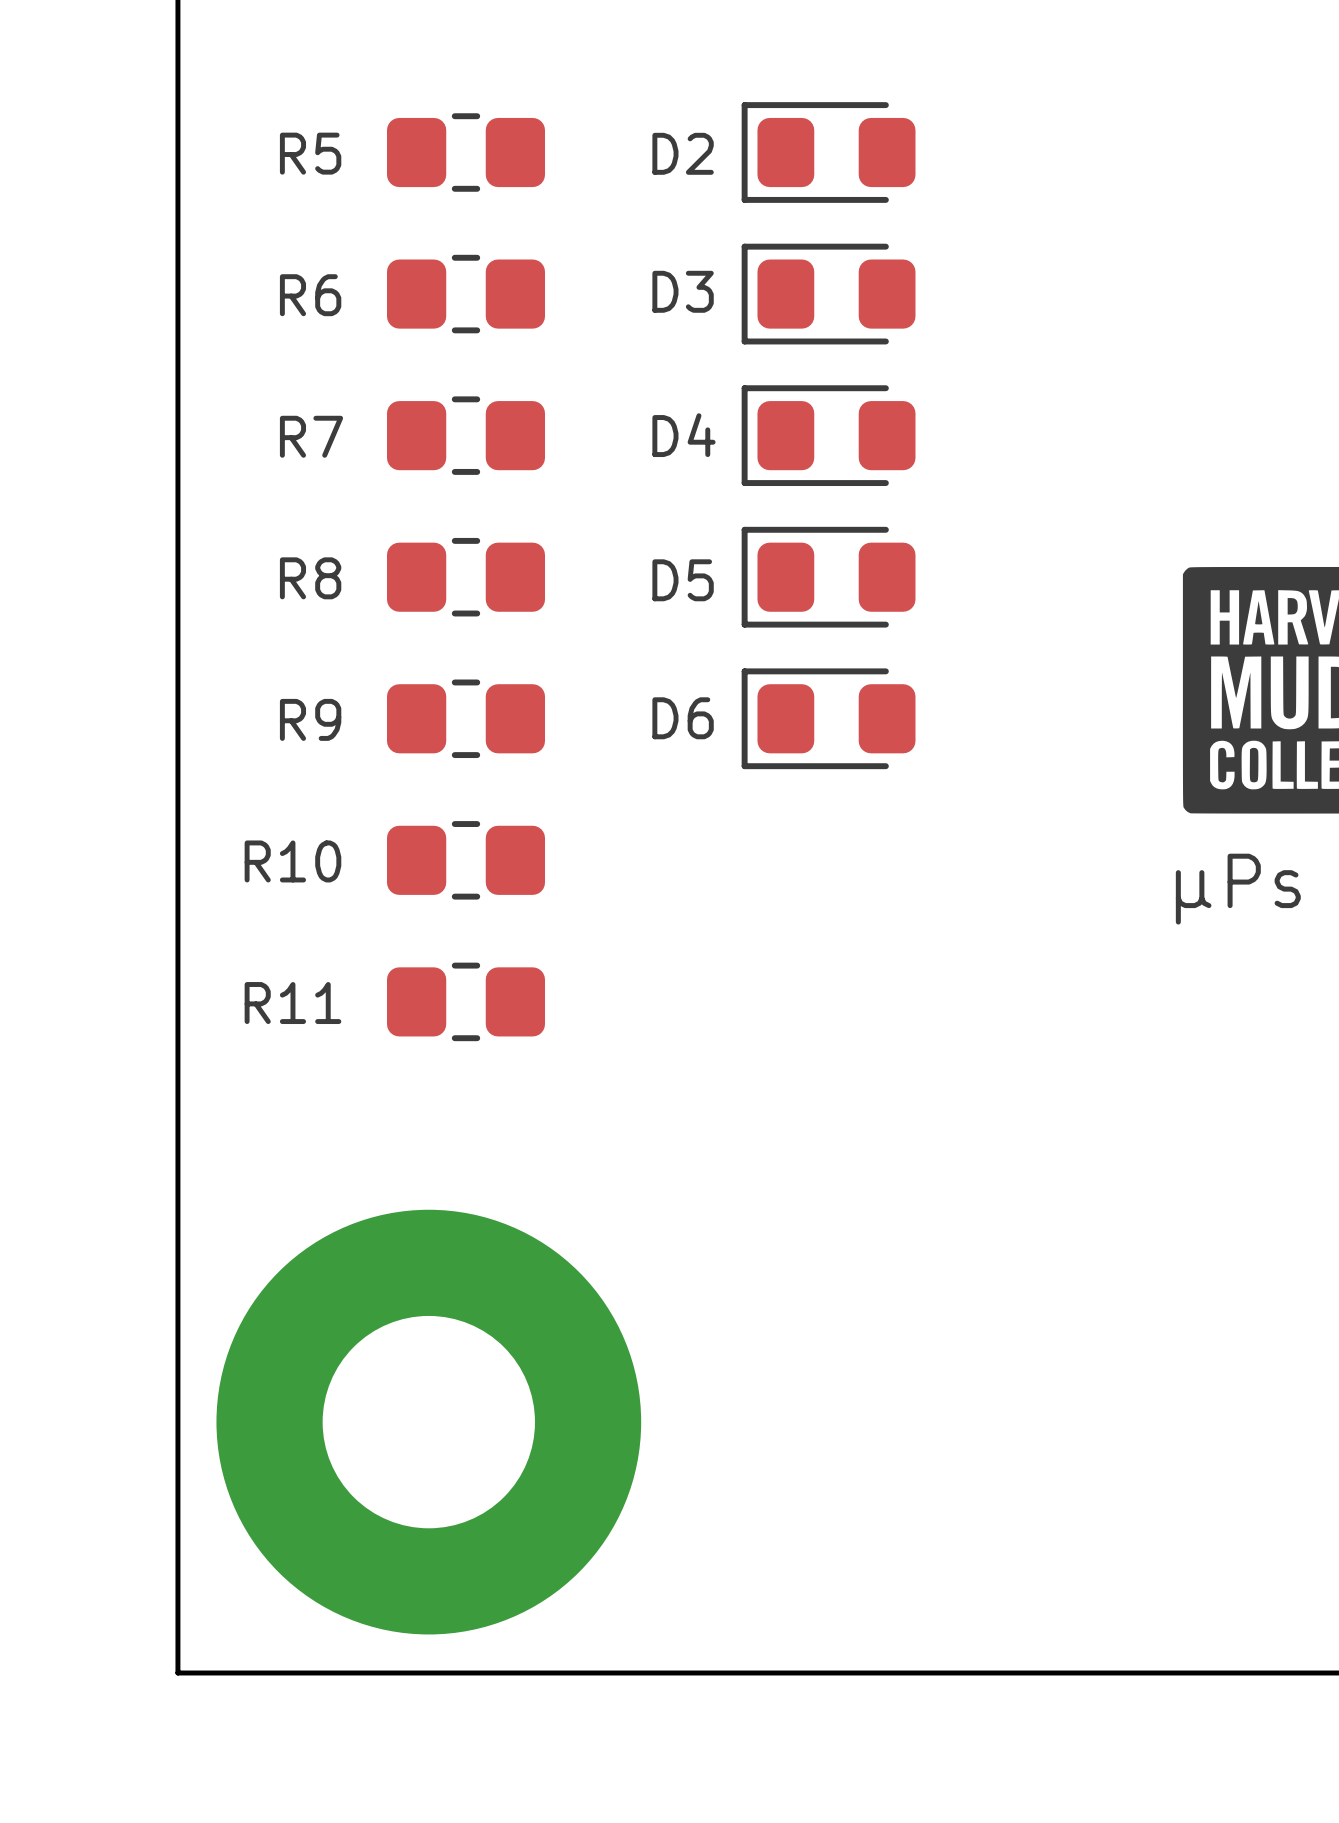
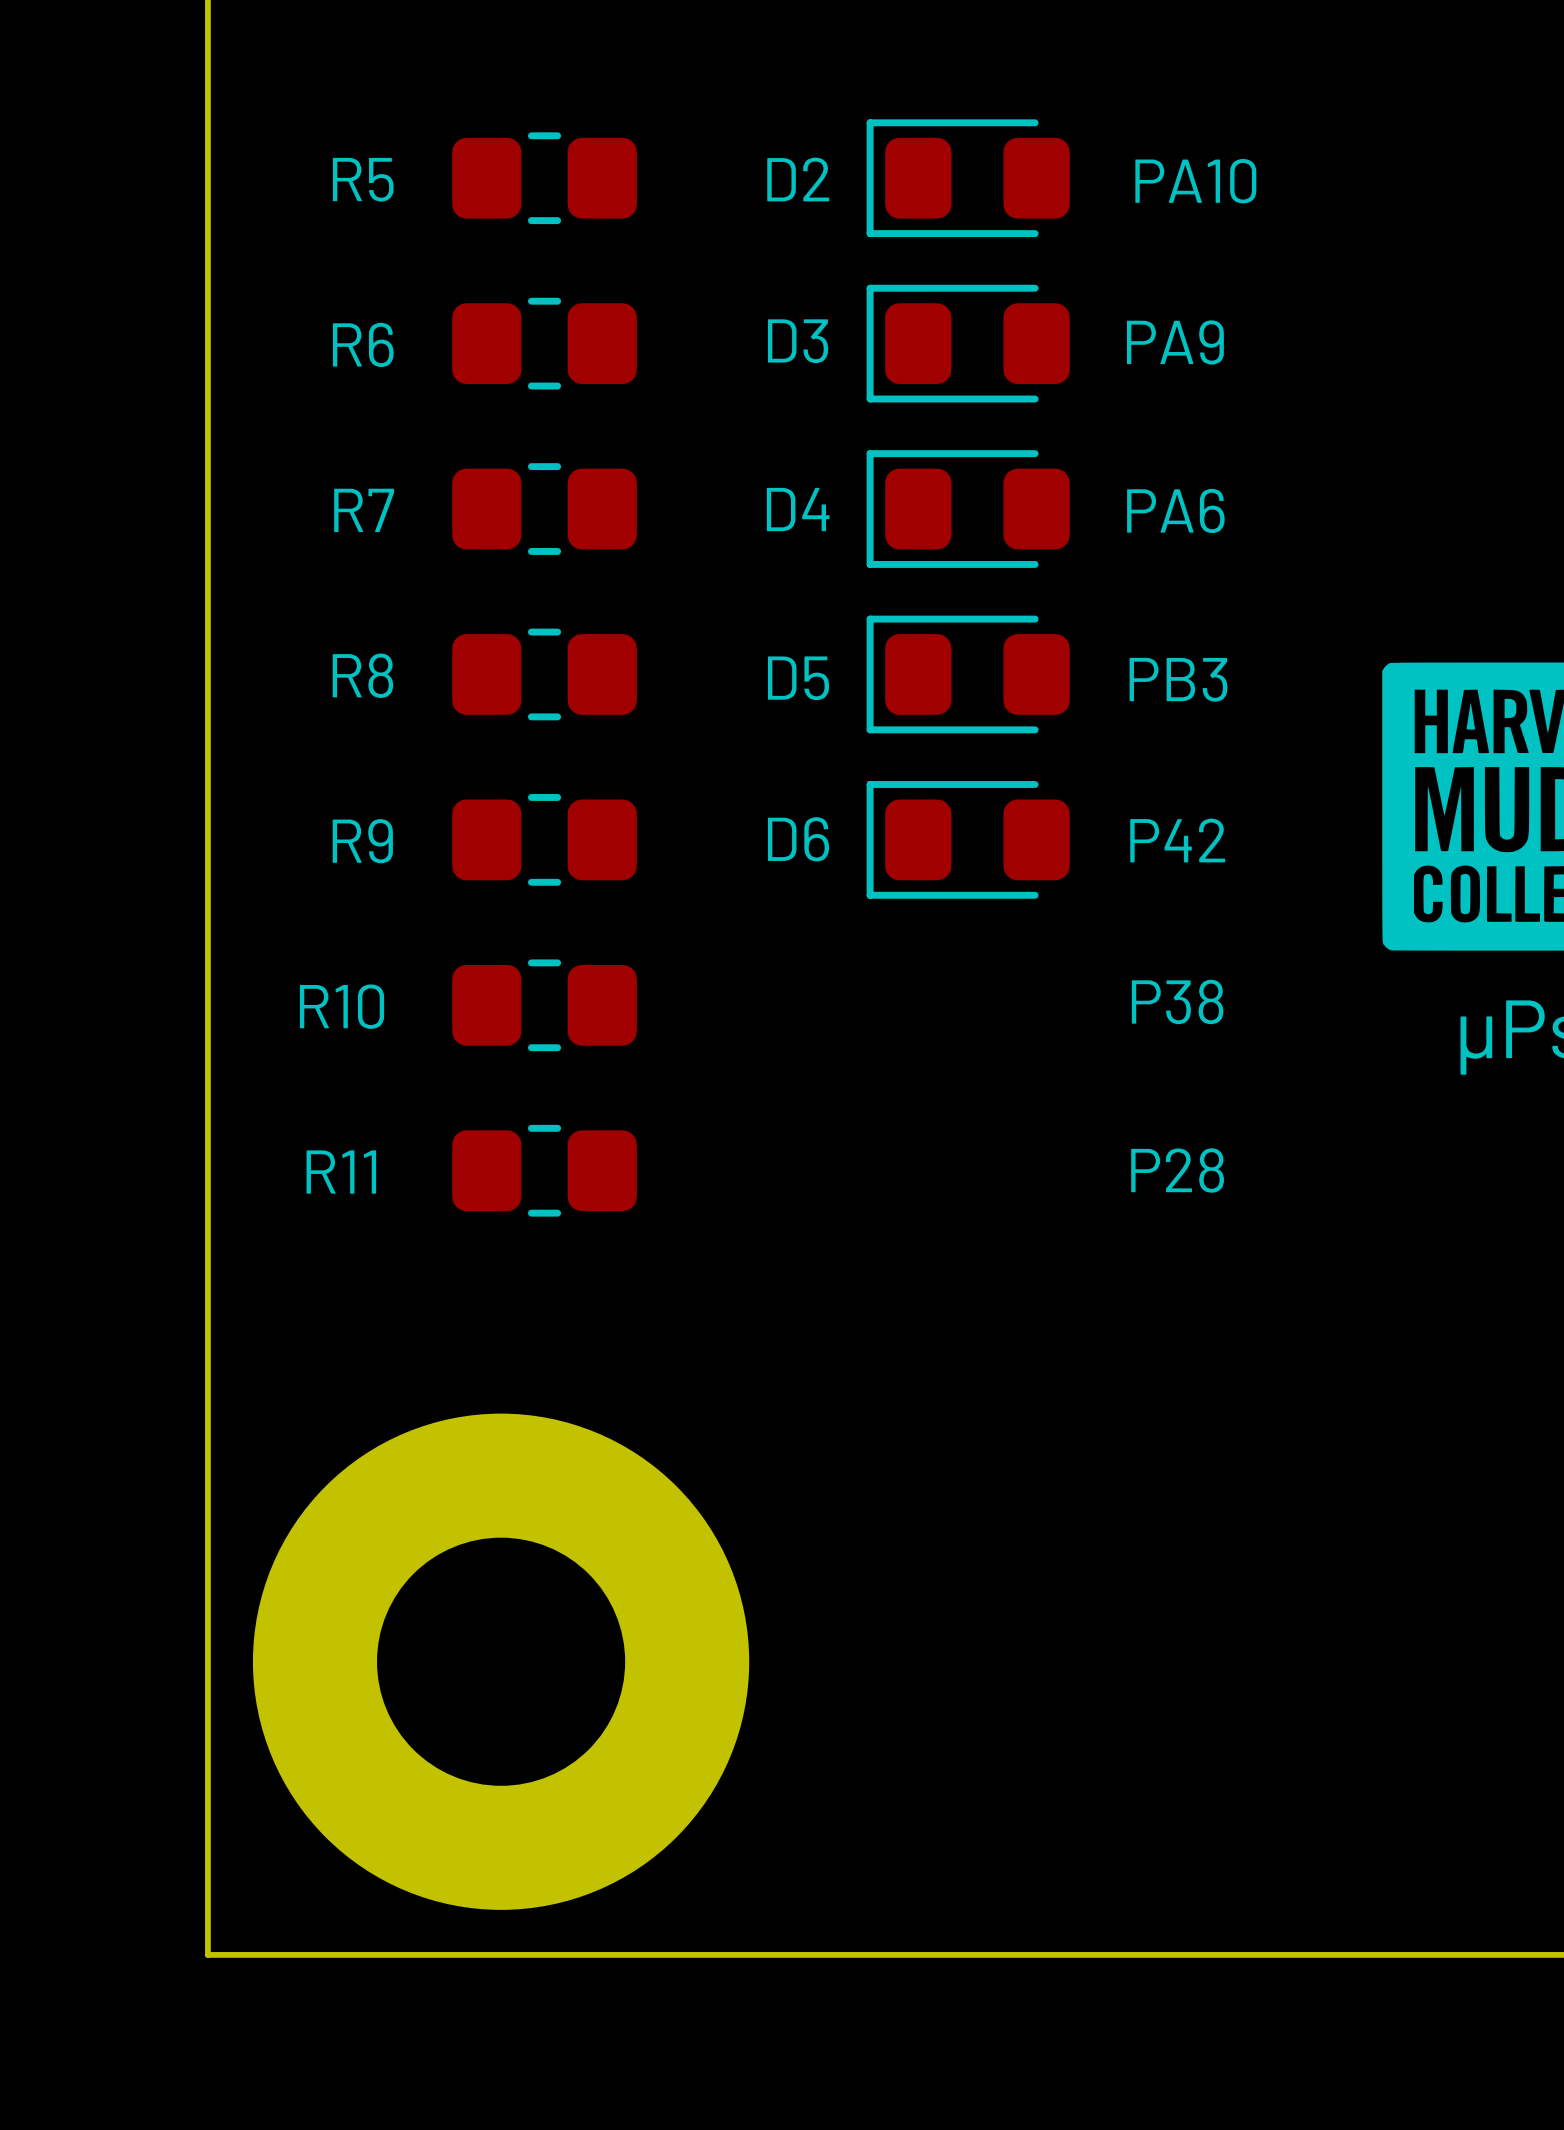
text: none -> PA10 (1195, 181)
text: none -> PA9 (1175, 342)
text: none -> PA6 (1175, 510)
text: none -> PB3 (1178, 679)
text: none -> P42 (1177, 840)
text: none -> P38 (1177, 1001)
text: none -> P28 (1177, 1170)

